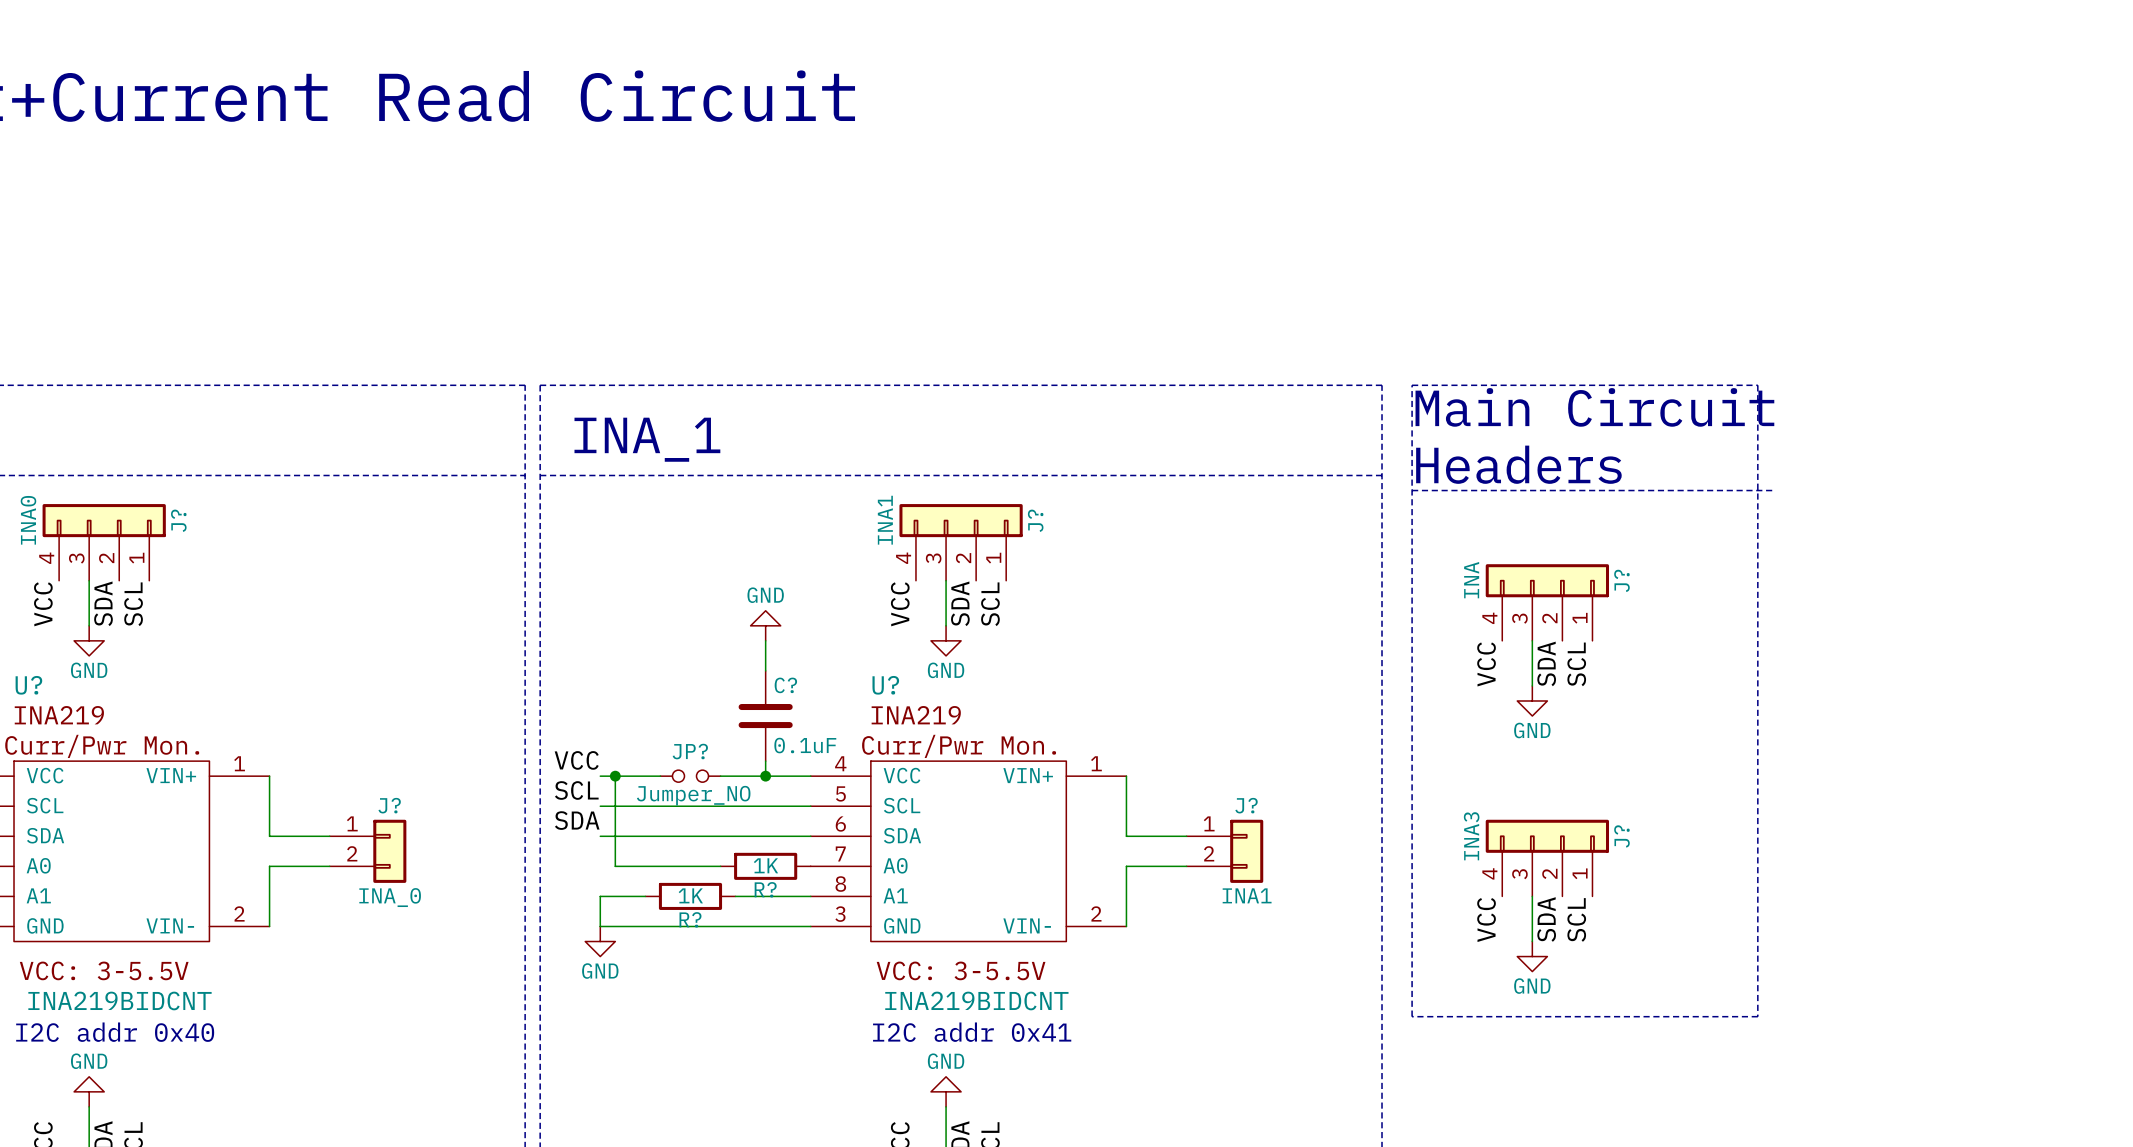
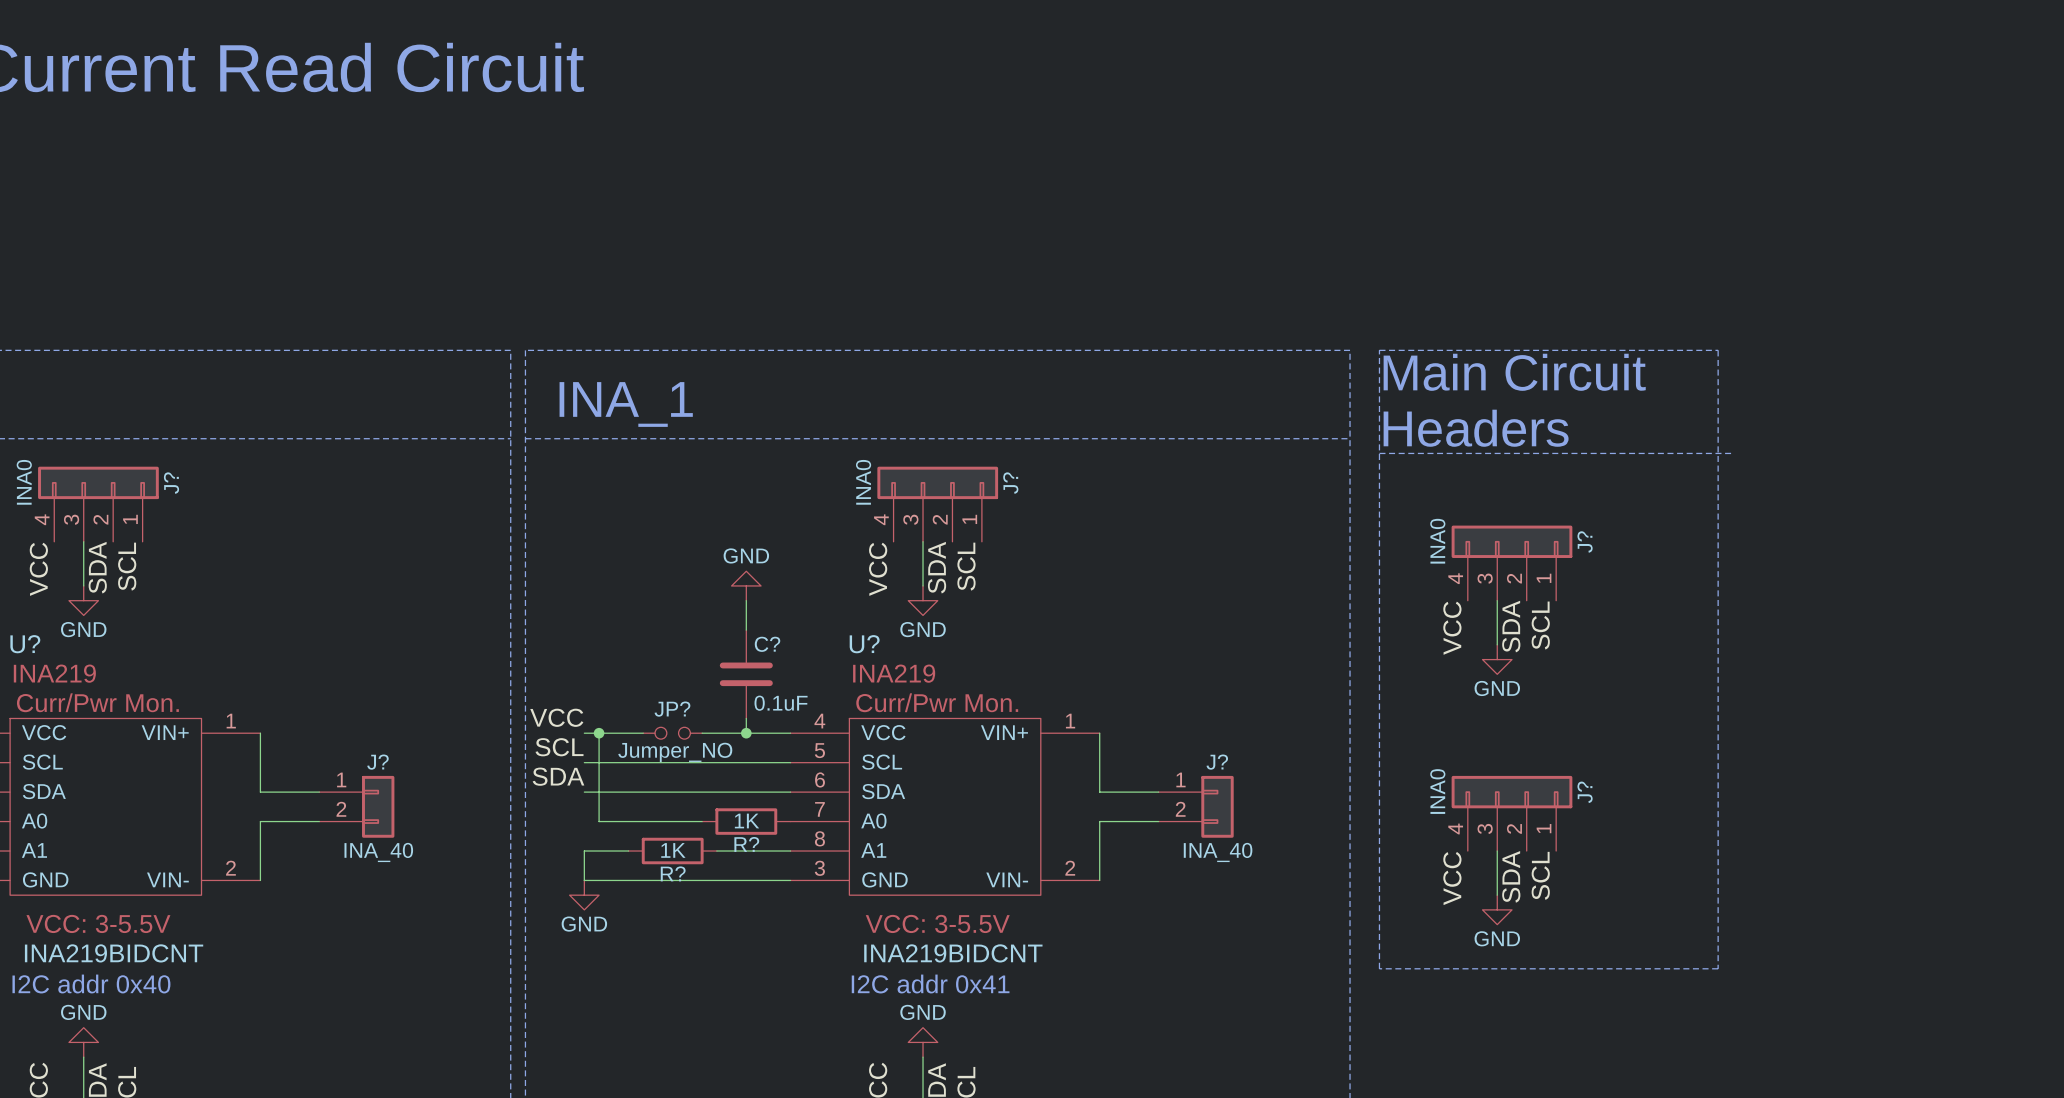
J? value: INA1 (885, 520) -> INA0 (863, 482)
J? value: INA (1471, 580) -> INA0 (1437, 541)
J? value: INA3 (1471, 836) -> INA0 (1437, 791)
J? value: INA1 (1247, 895) -> INA_40 (1218, 852)
J? value: INA_0 (390, 897) -> INA_40 (378, 852)

